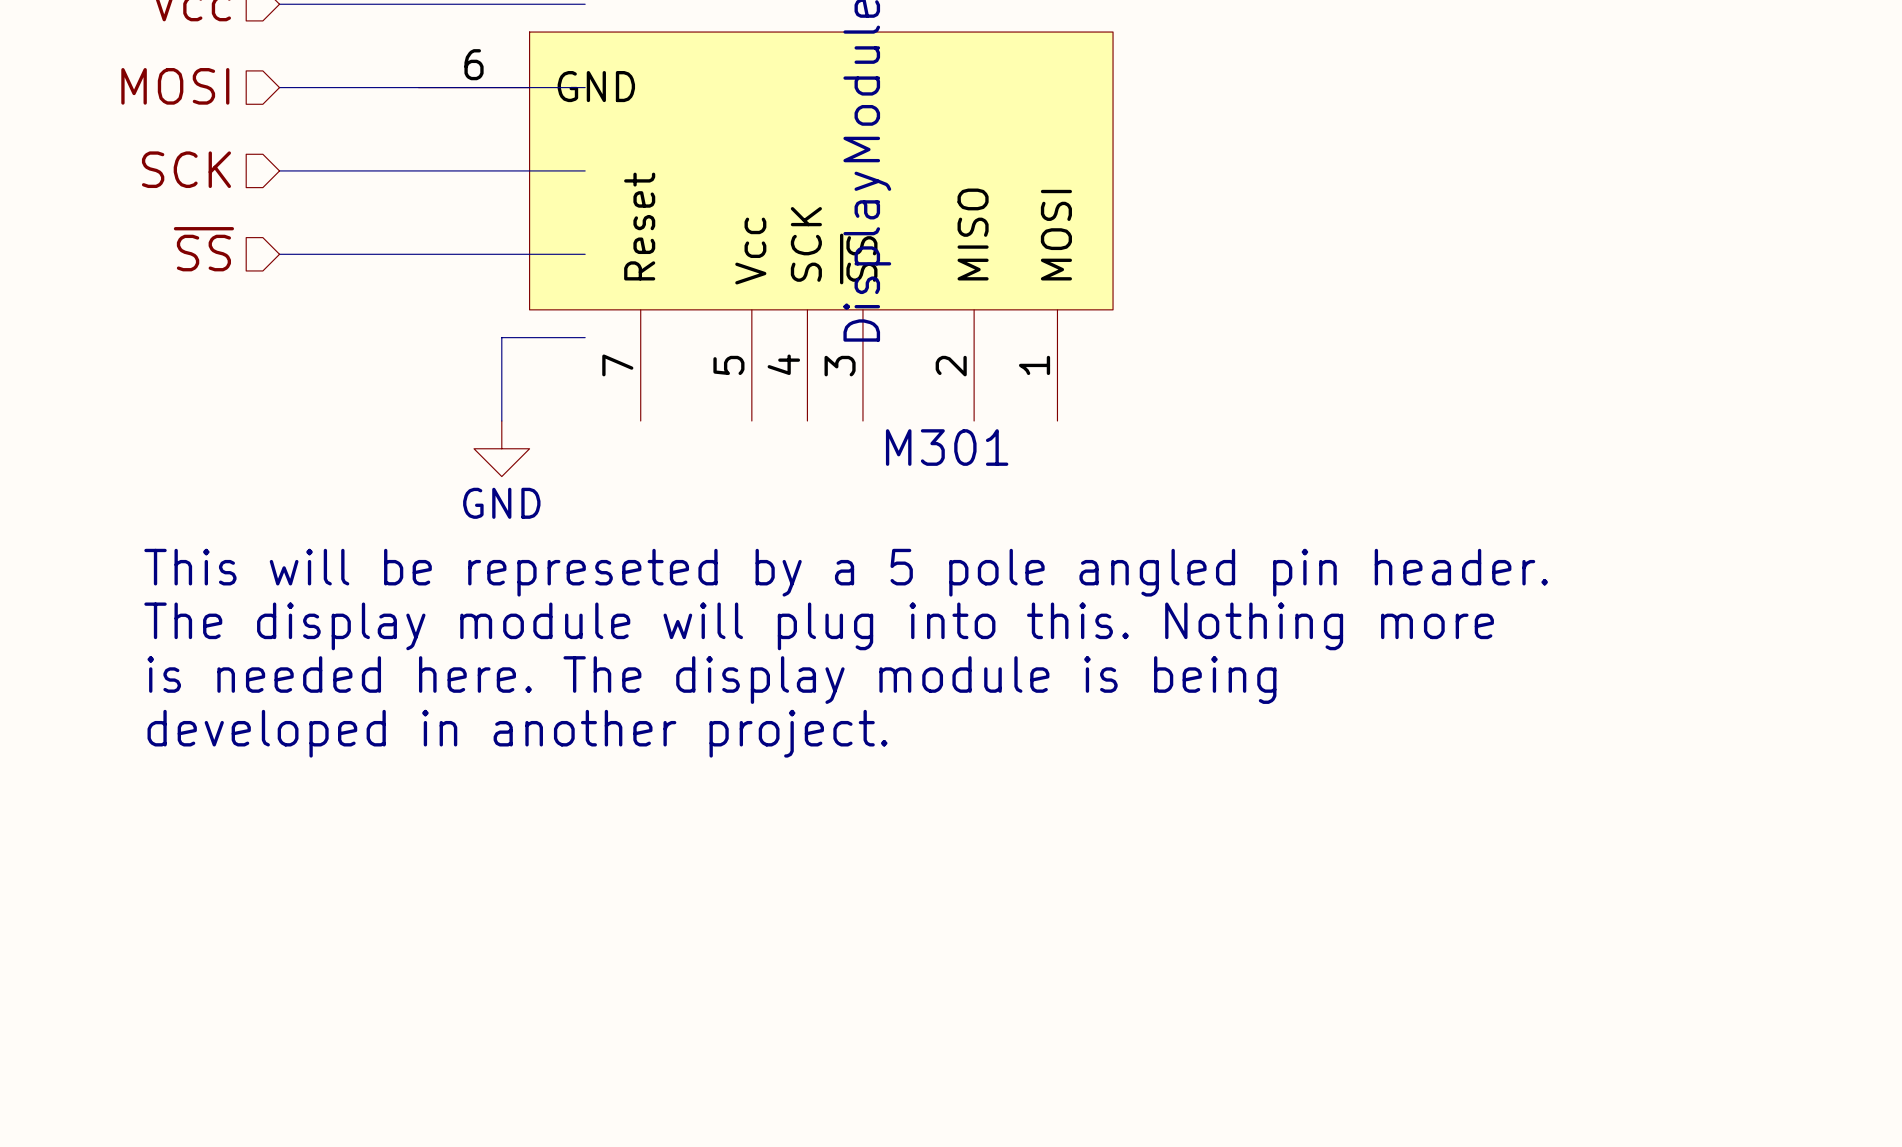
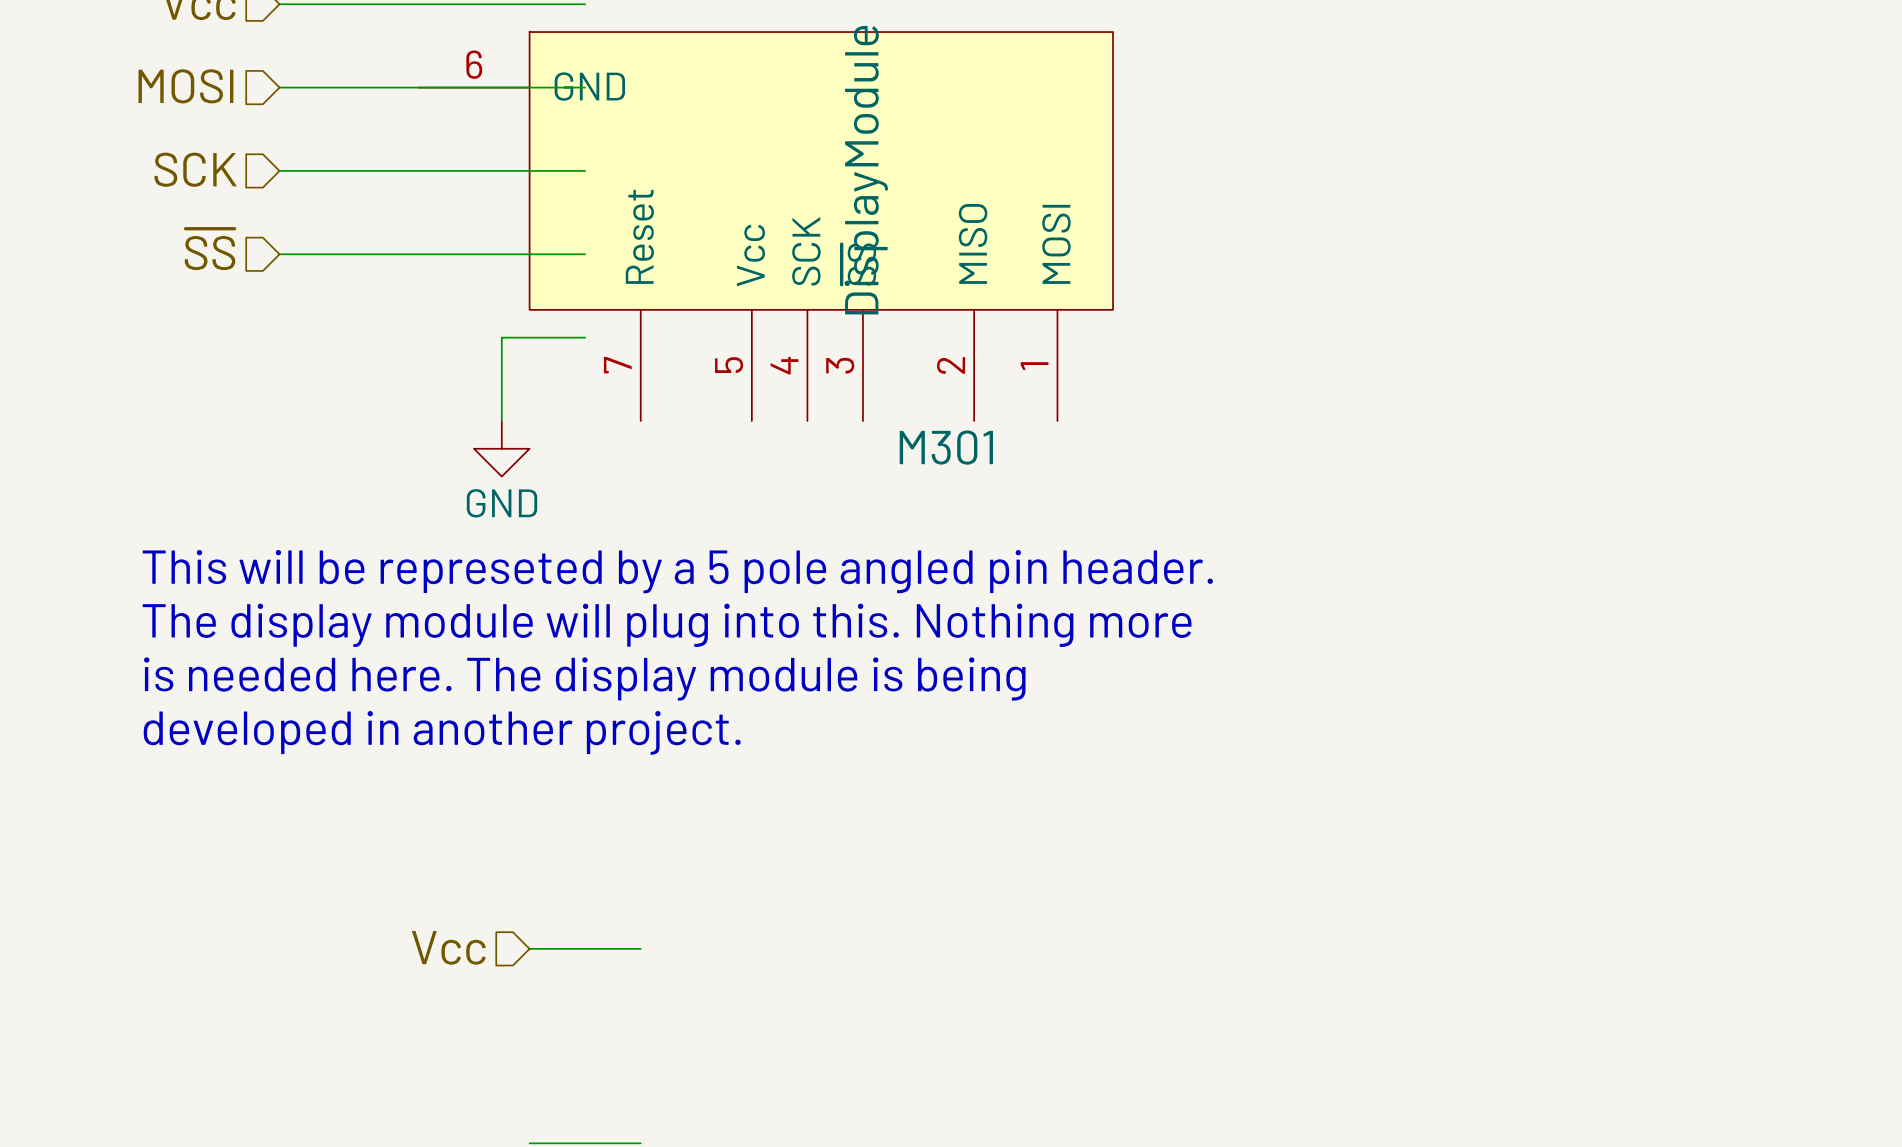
hierarchical label: none -> Vcc (448, 947)
wire: none -> (529, 948) (640, 948)
wire: none -> (529, 1143) (640, 1143)

